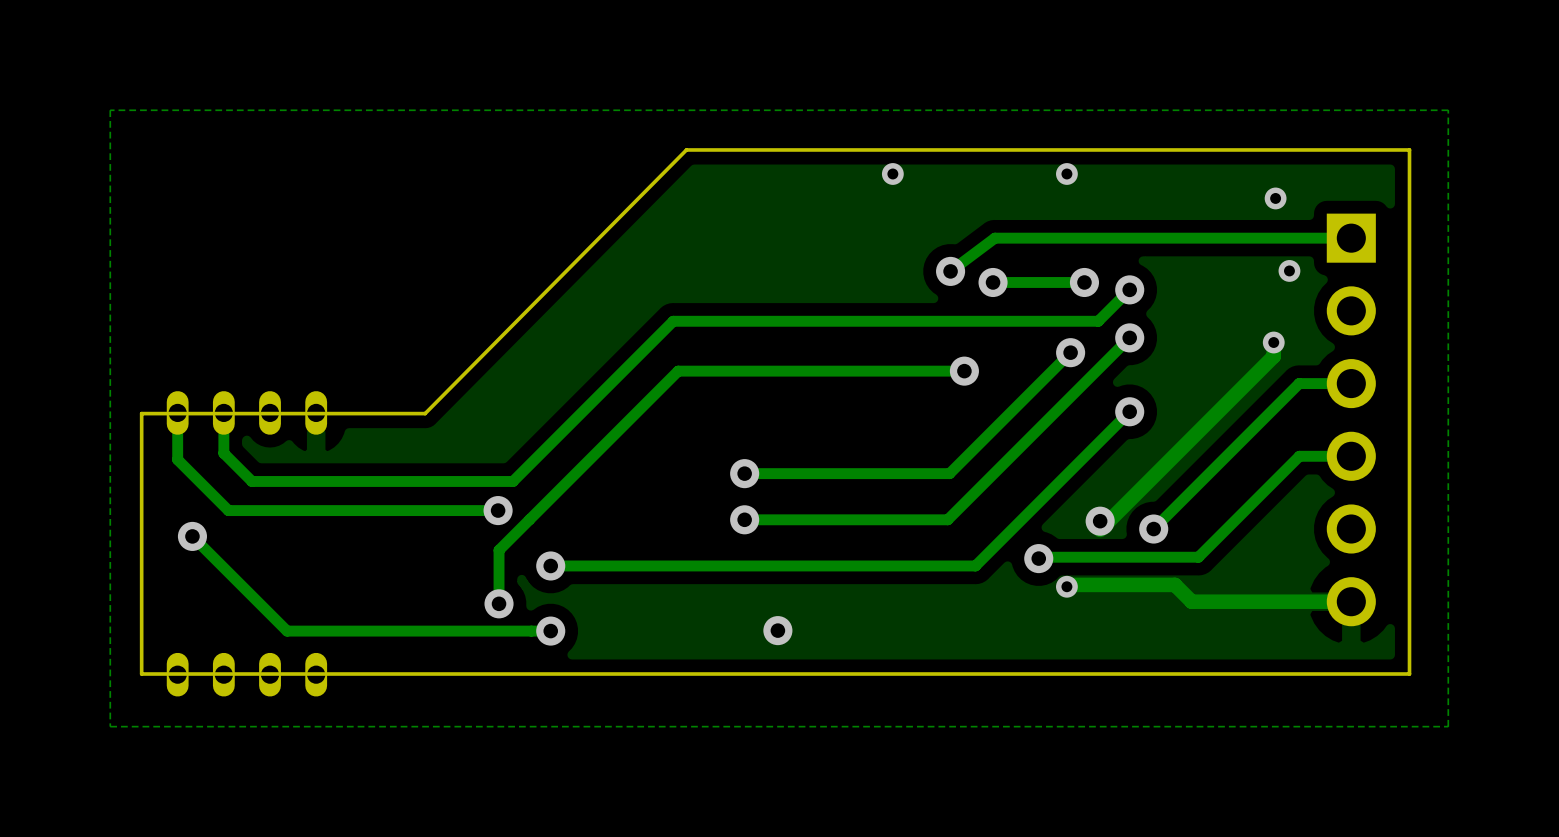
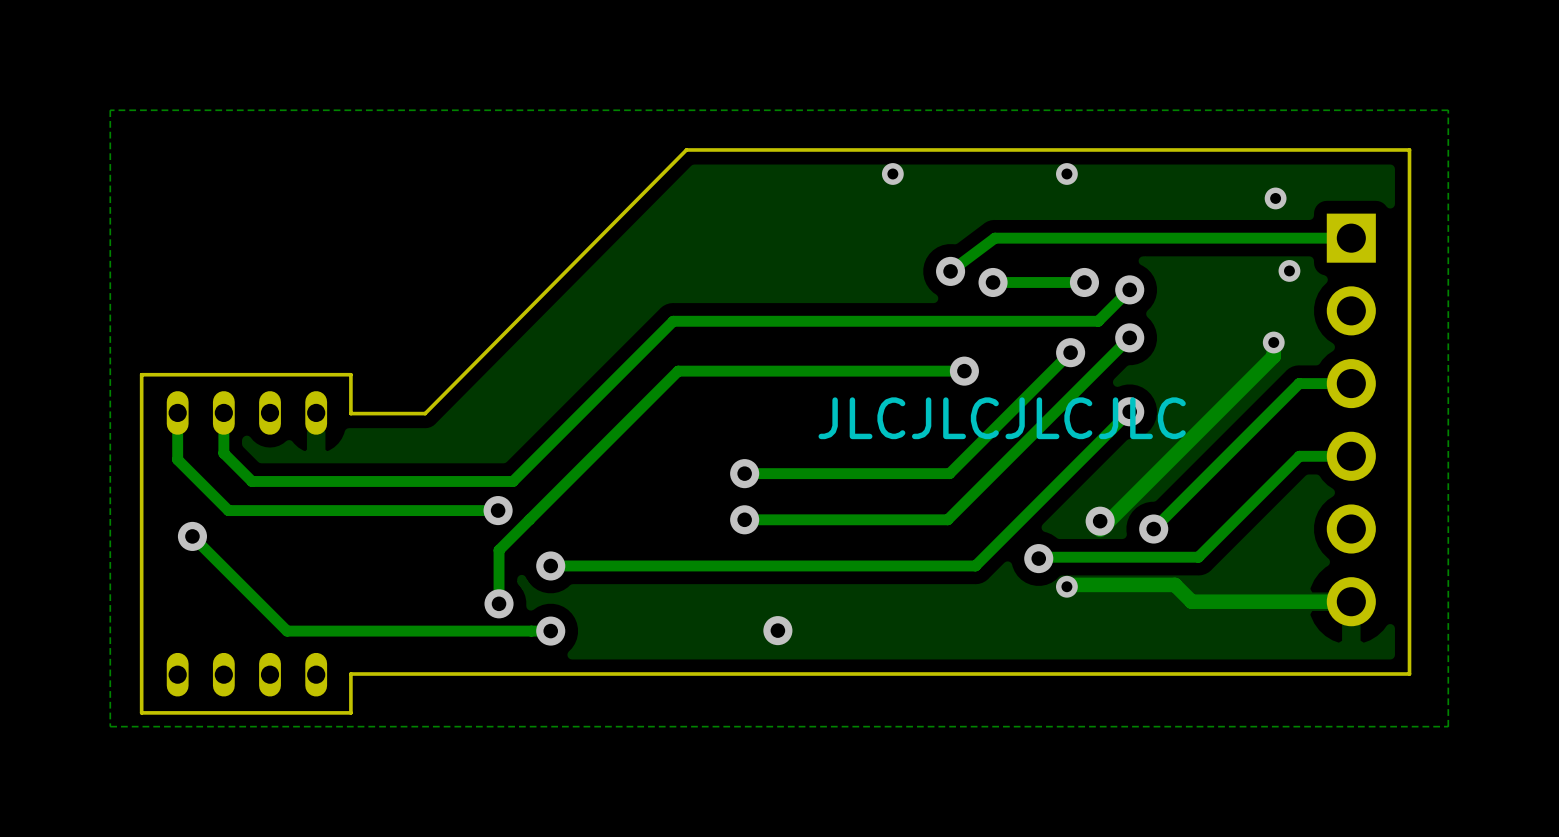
board edge: (350, 413) (141, 413) -> (350, 413) (350, 374) (141, 374) (141, 413)
text: none -> JLCJLCJLCJLC (1002, 418)
board edge: (350, 674) (141, 674) -> (350, 674) (350, 712) (141, 712) (141, 674)

